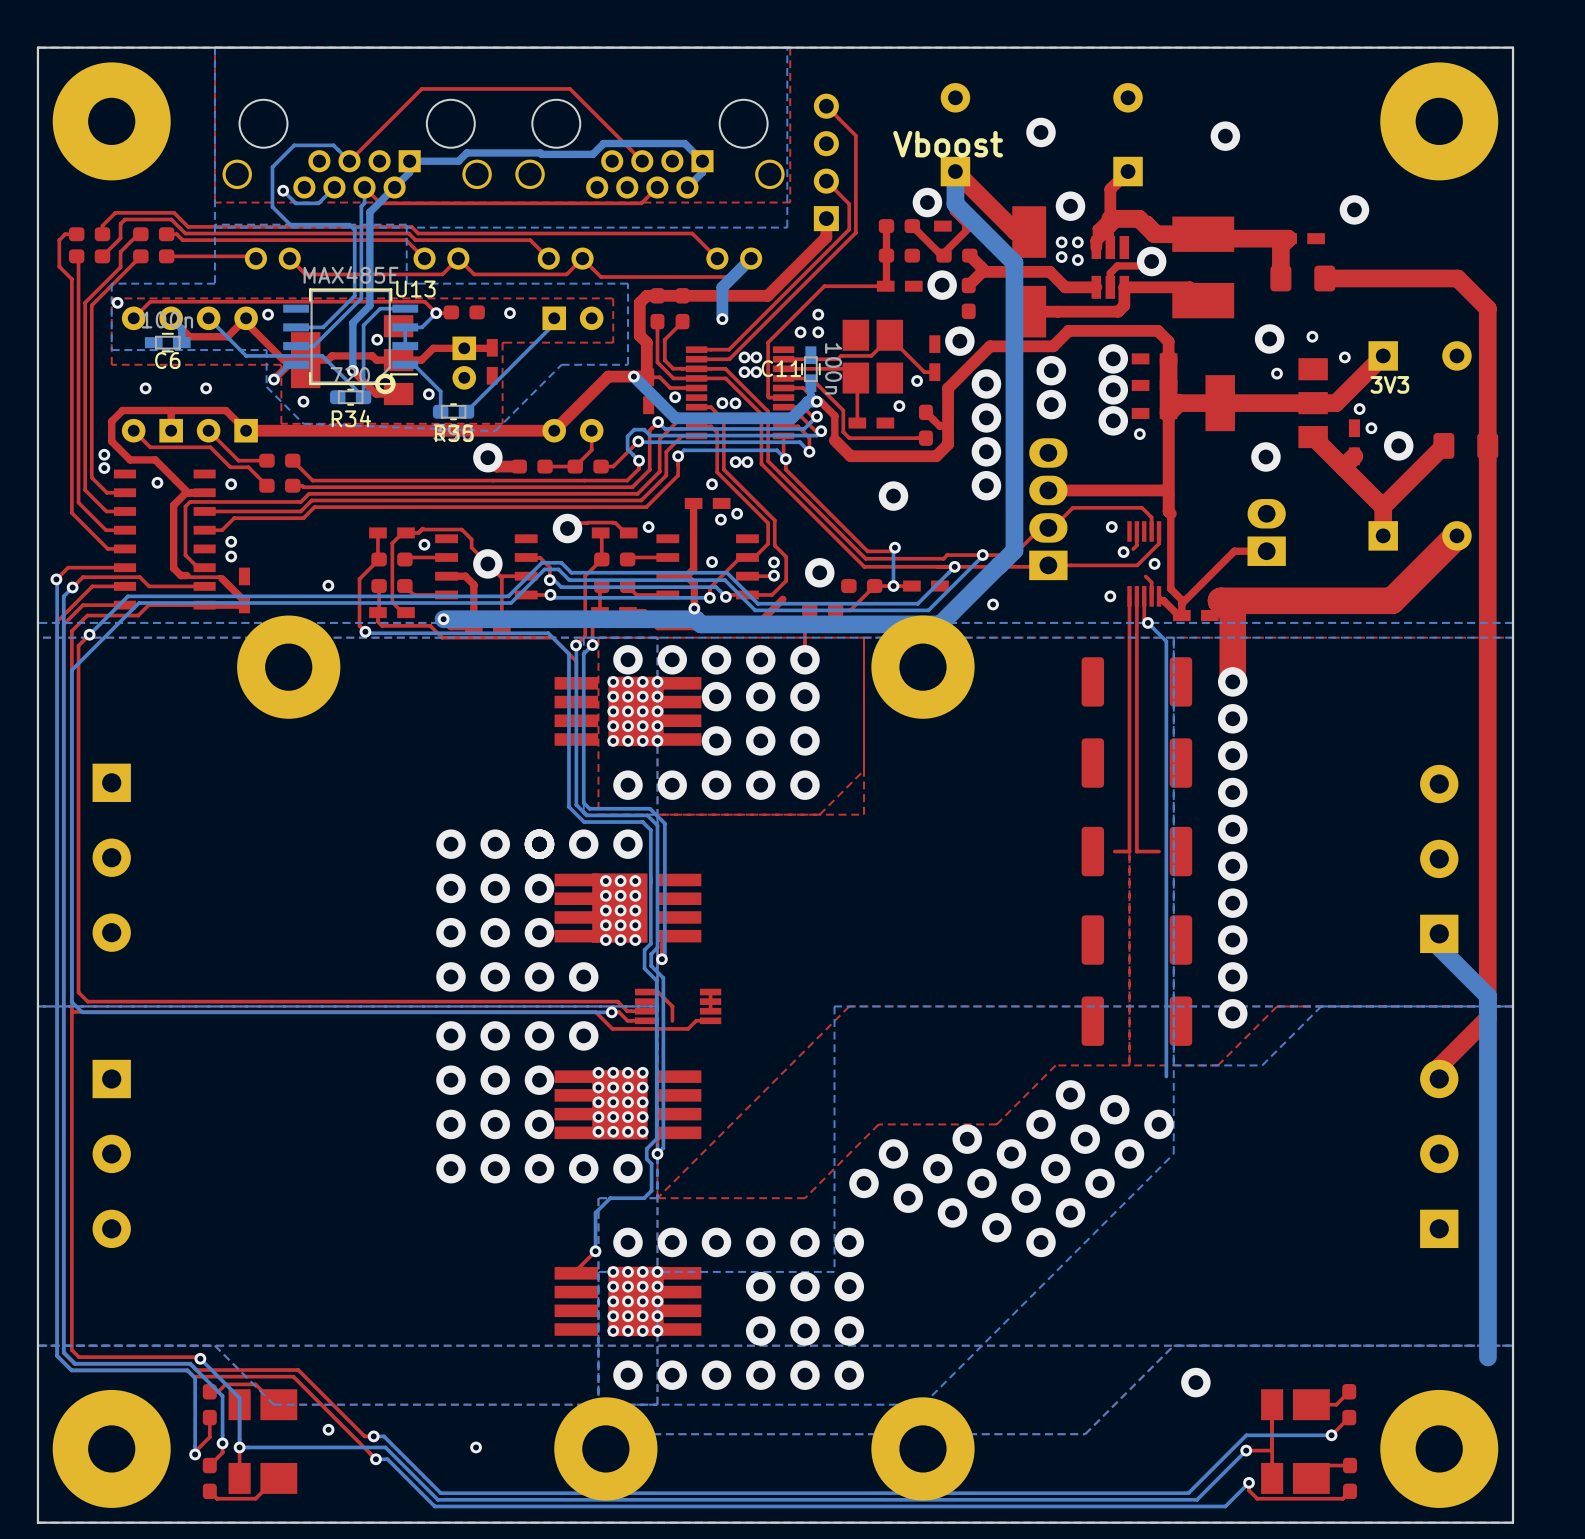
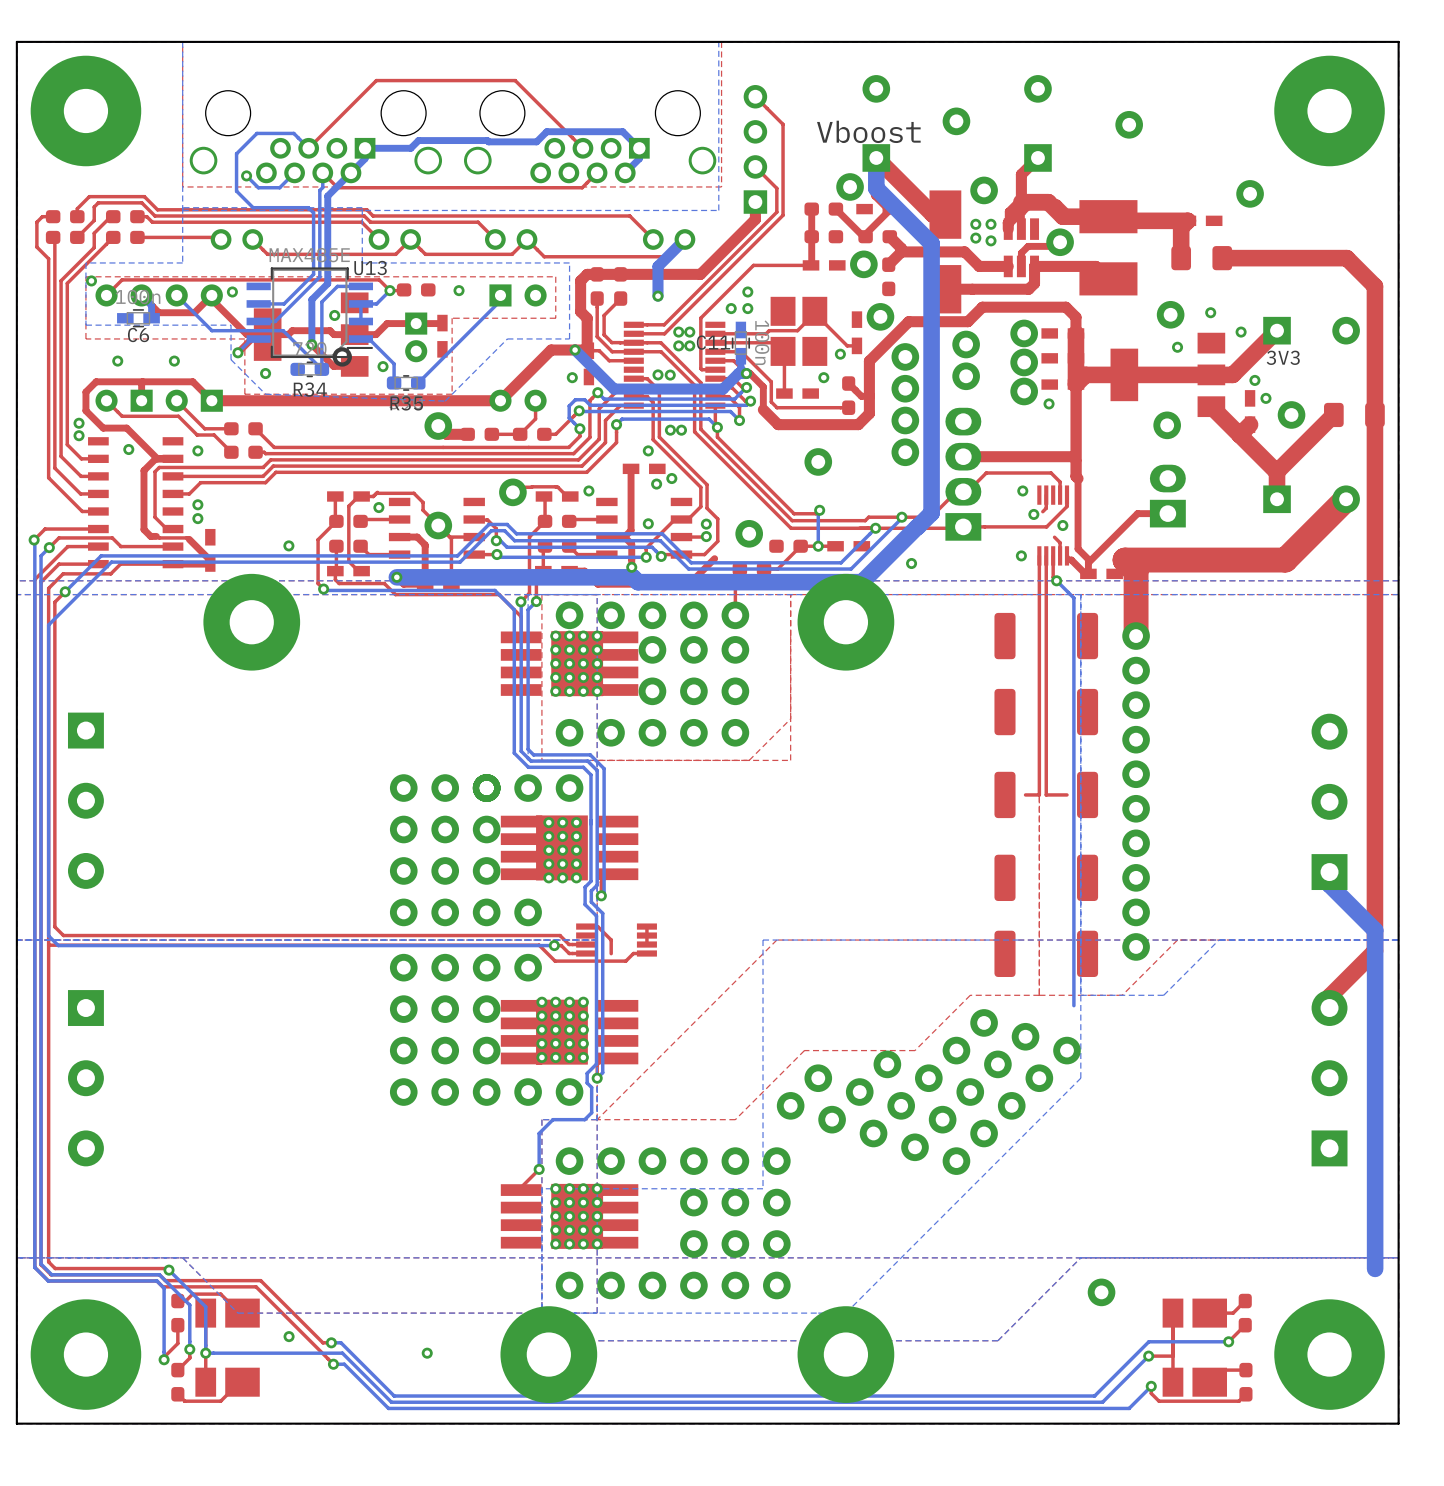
via position: (675, 397) -> (572, 377)

